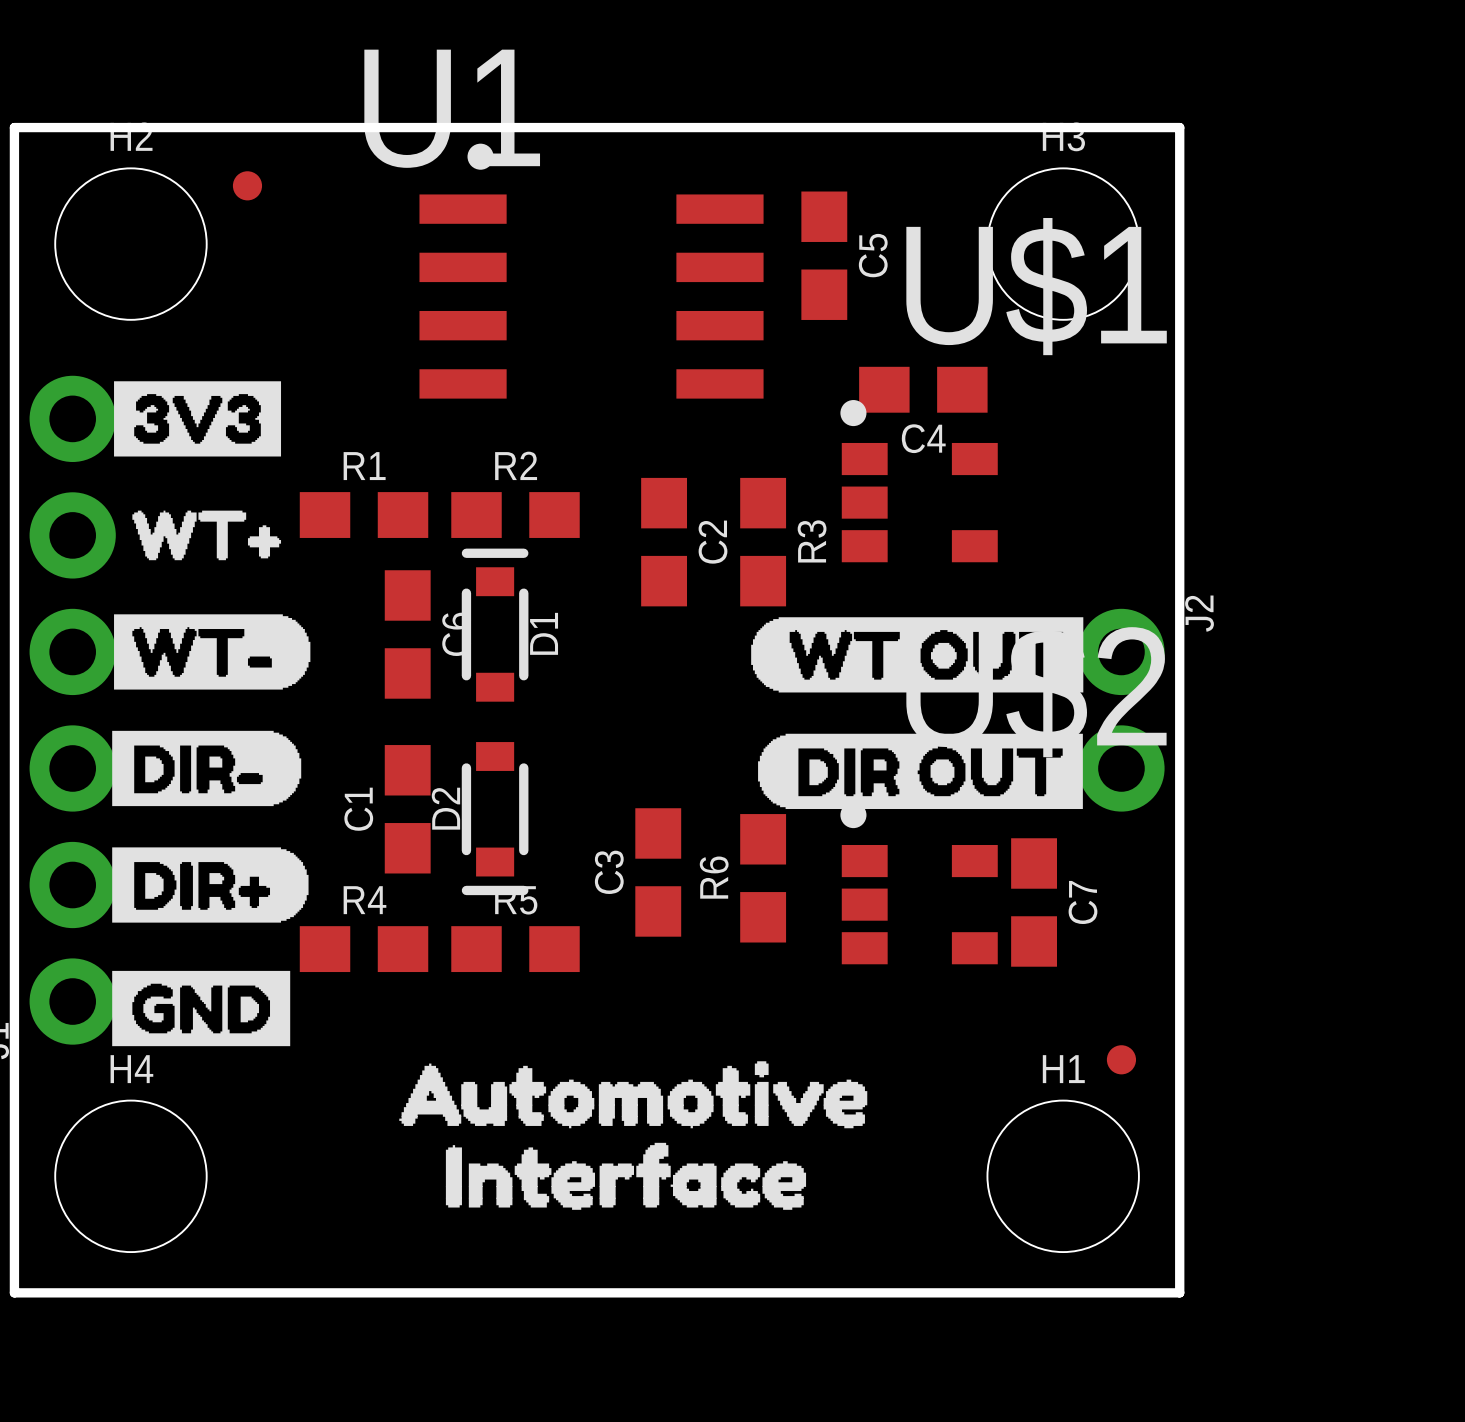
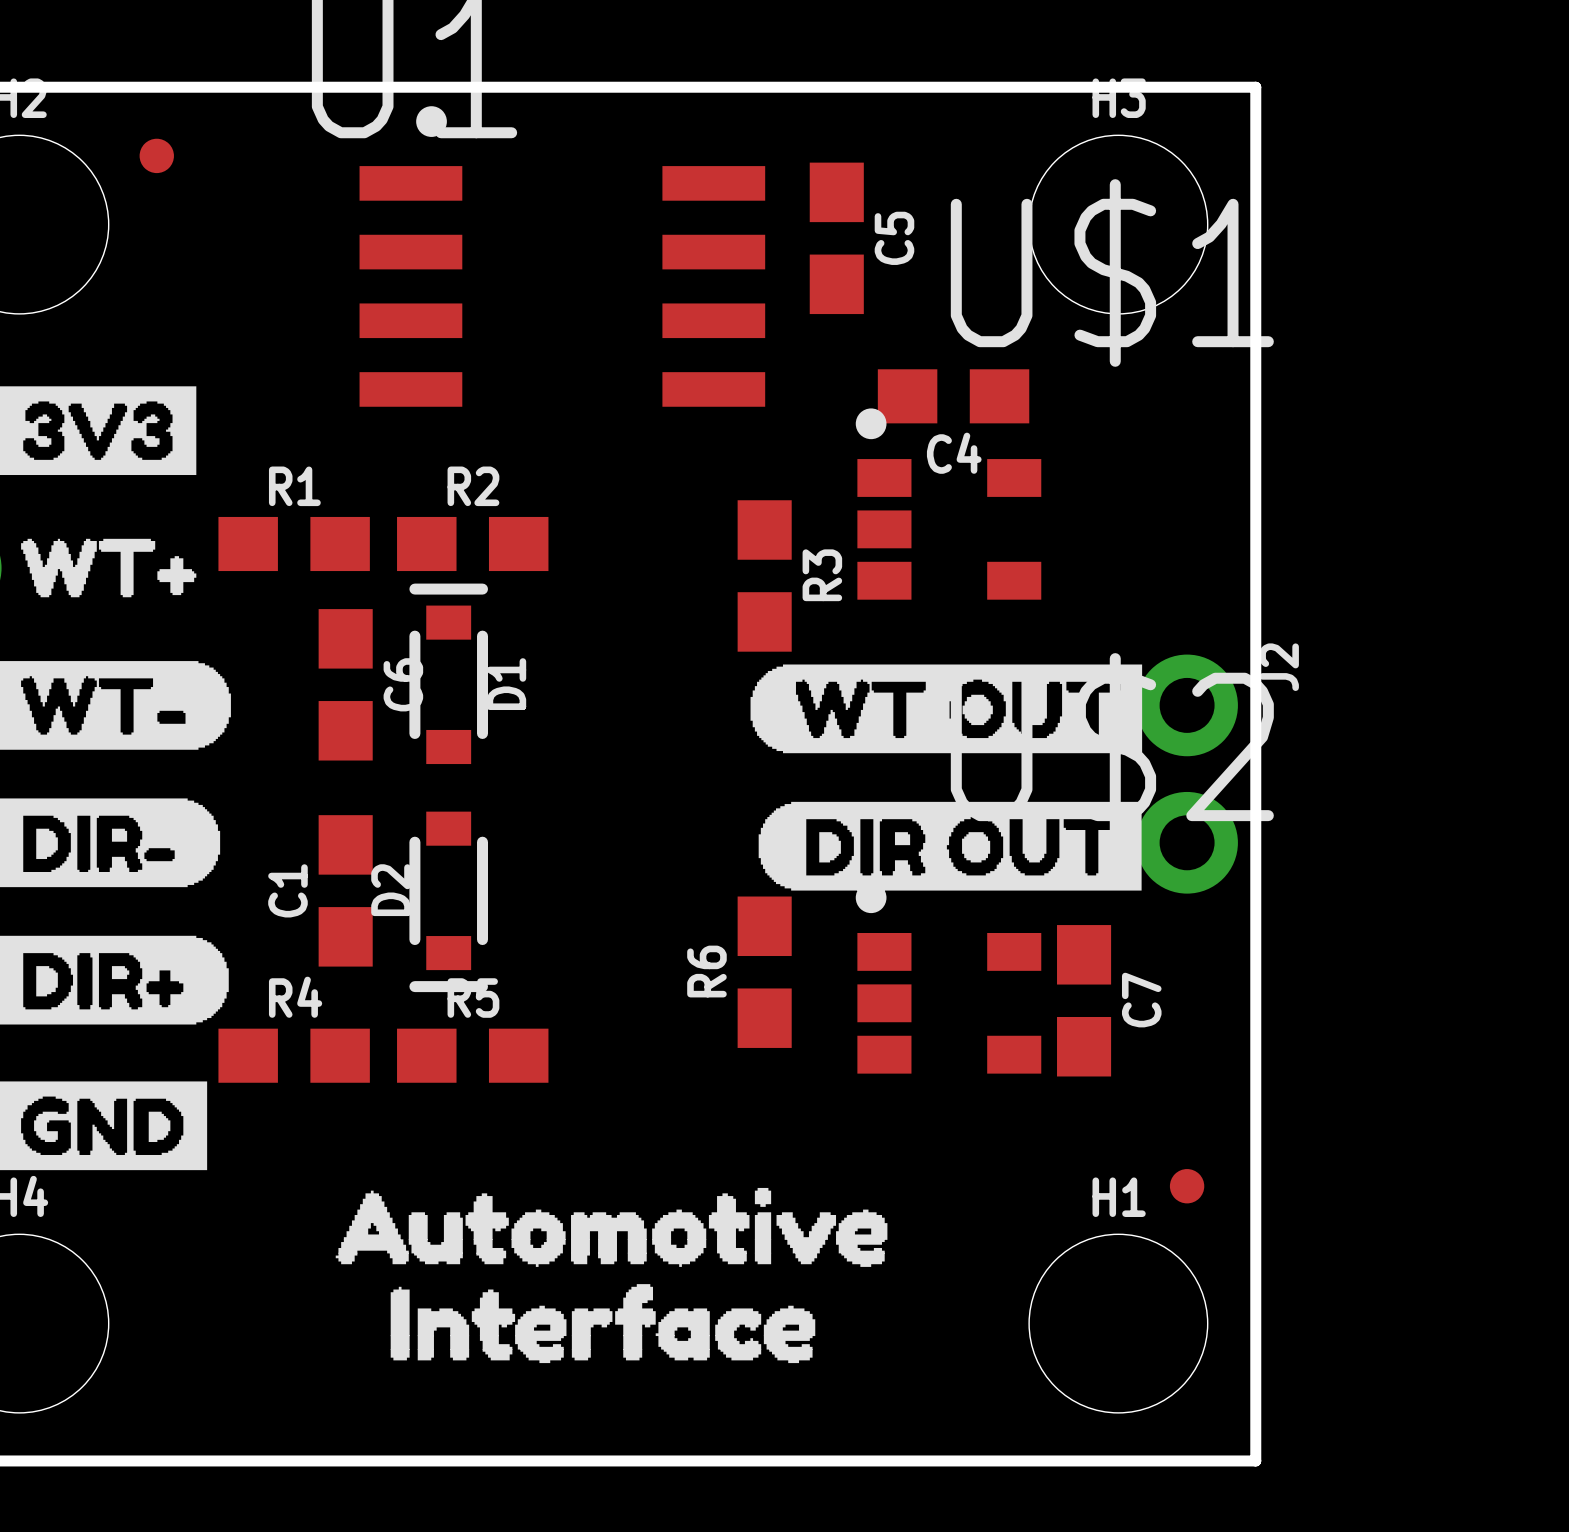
C2: (664, 542) -> none
C3: (658, 872) -> none

